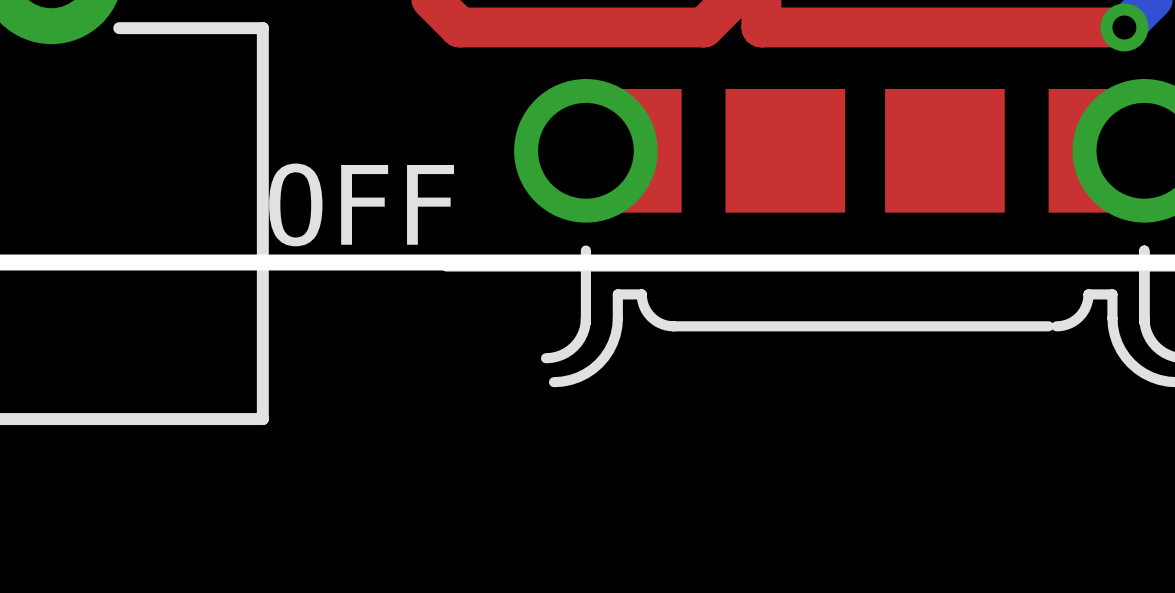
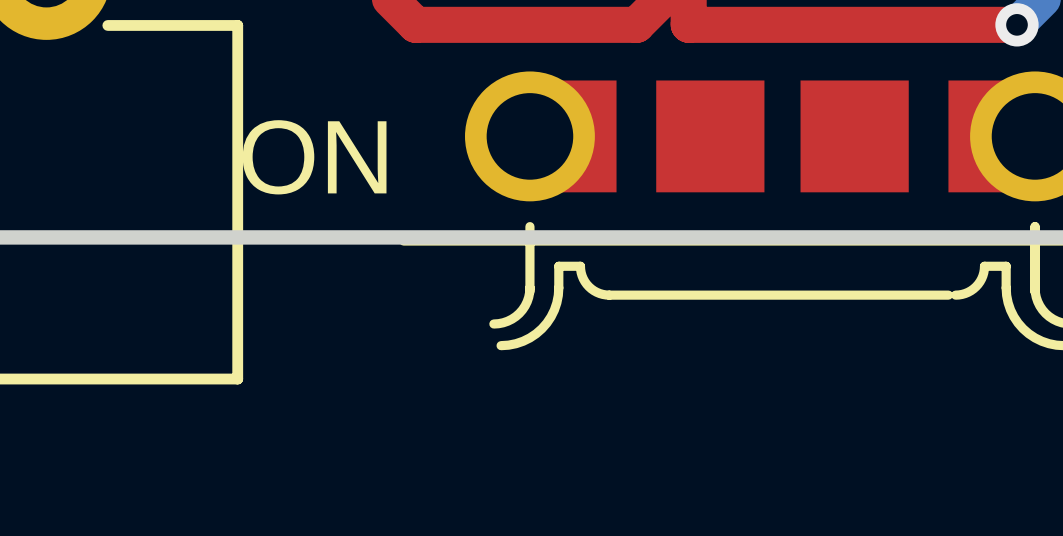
text: OFF (361, 204) -> ON (314, 157)

